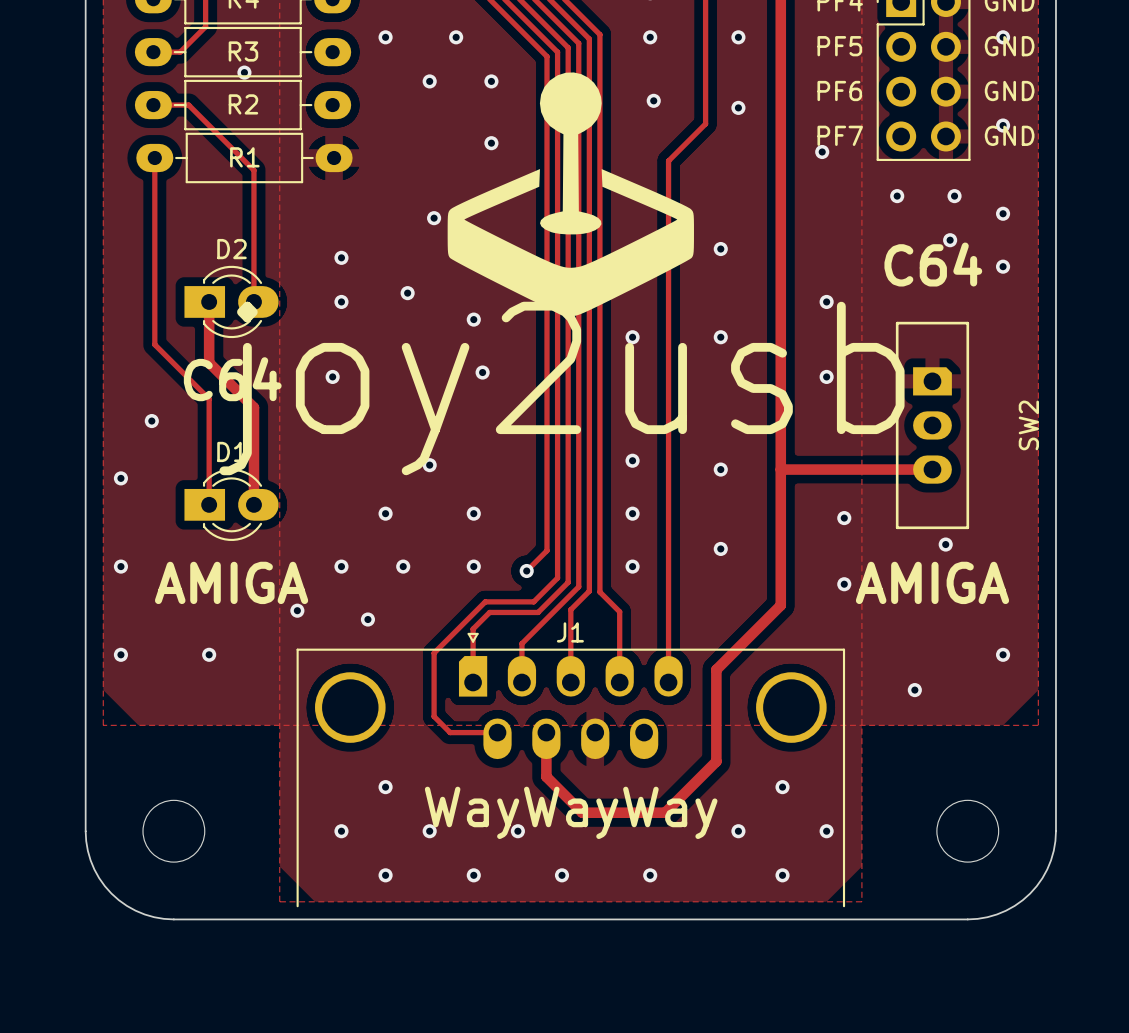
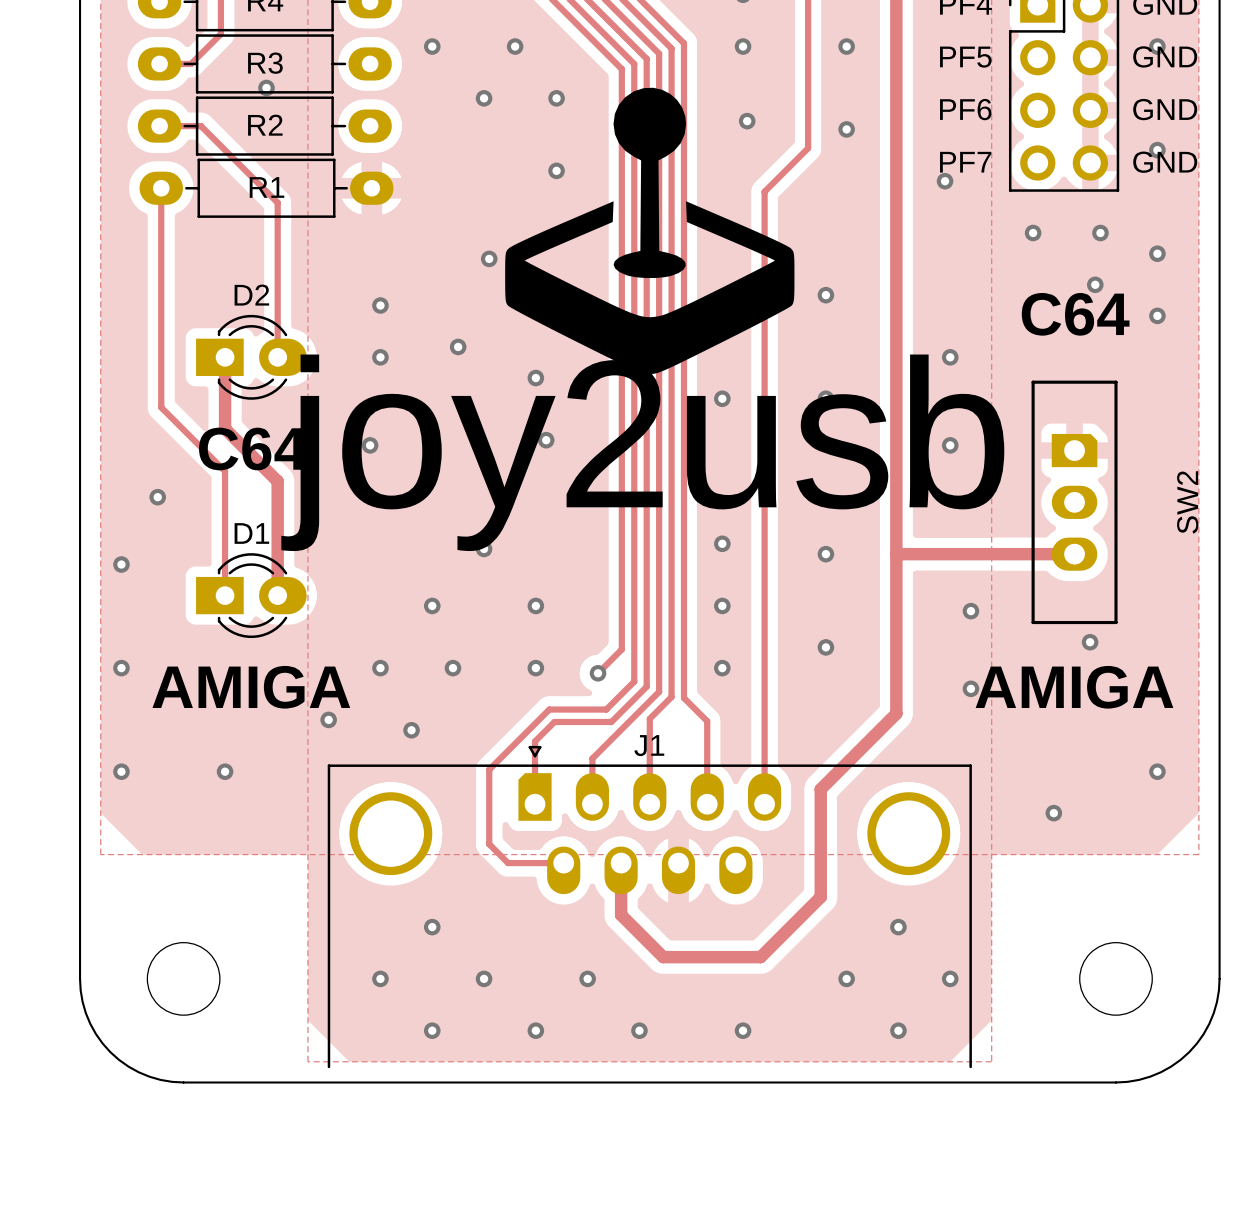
text: WayWayWay (571, 812) -> none

